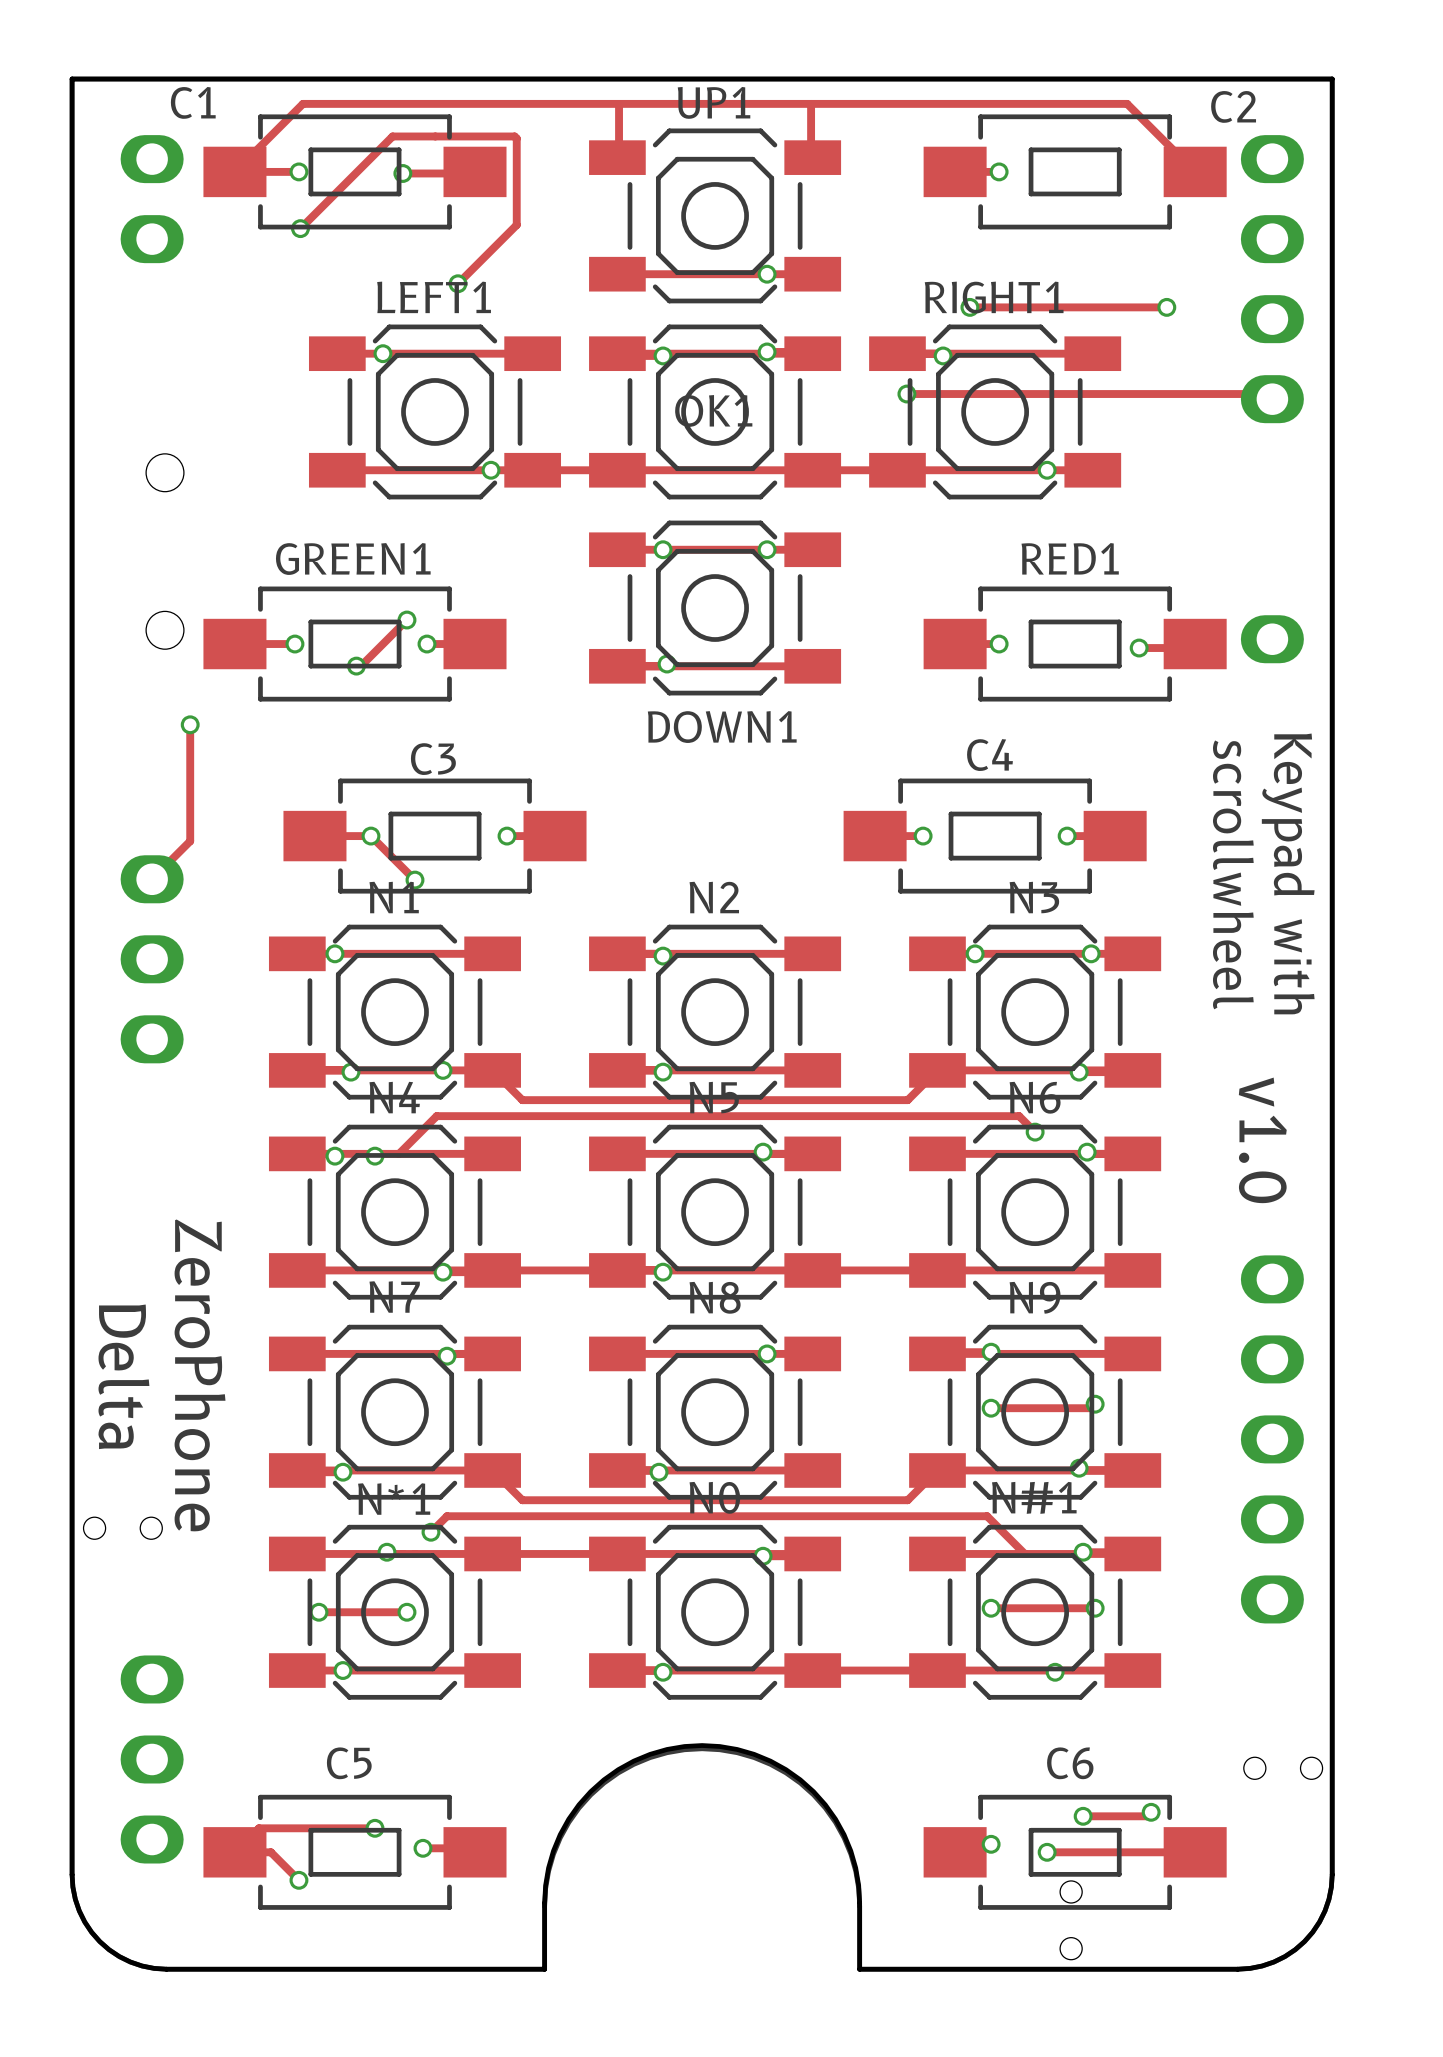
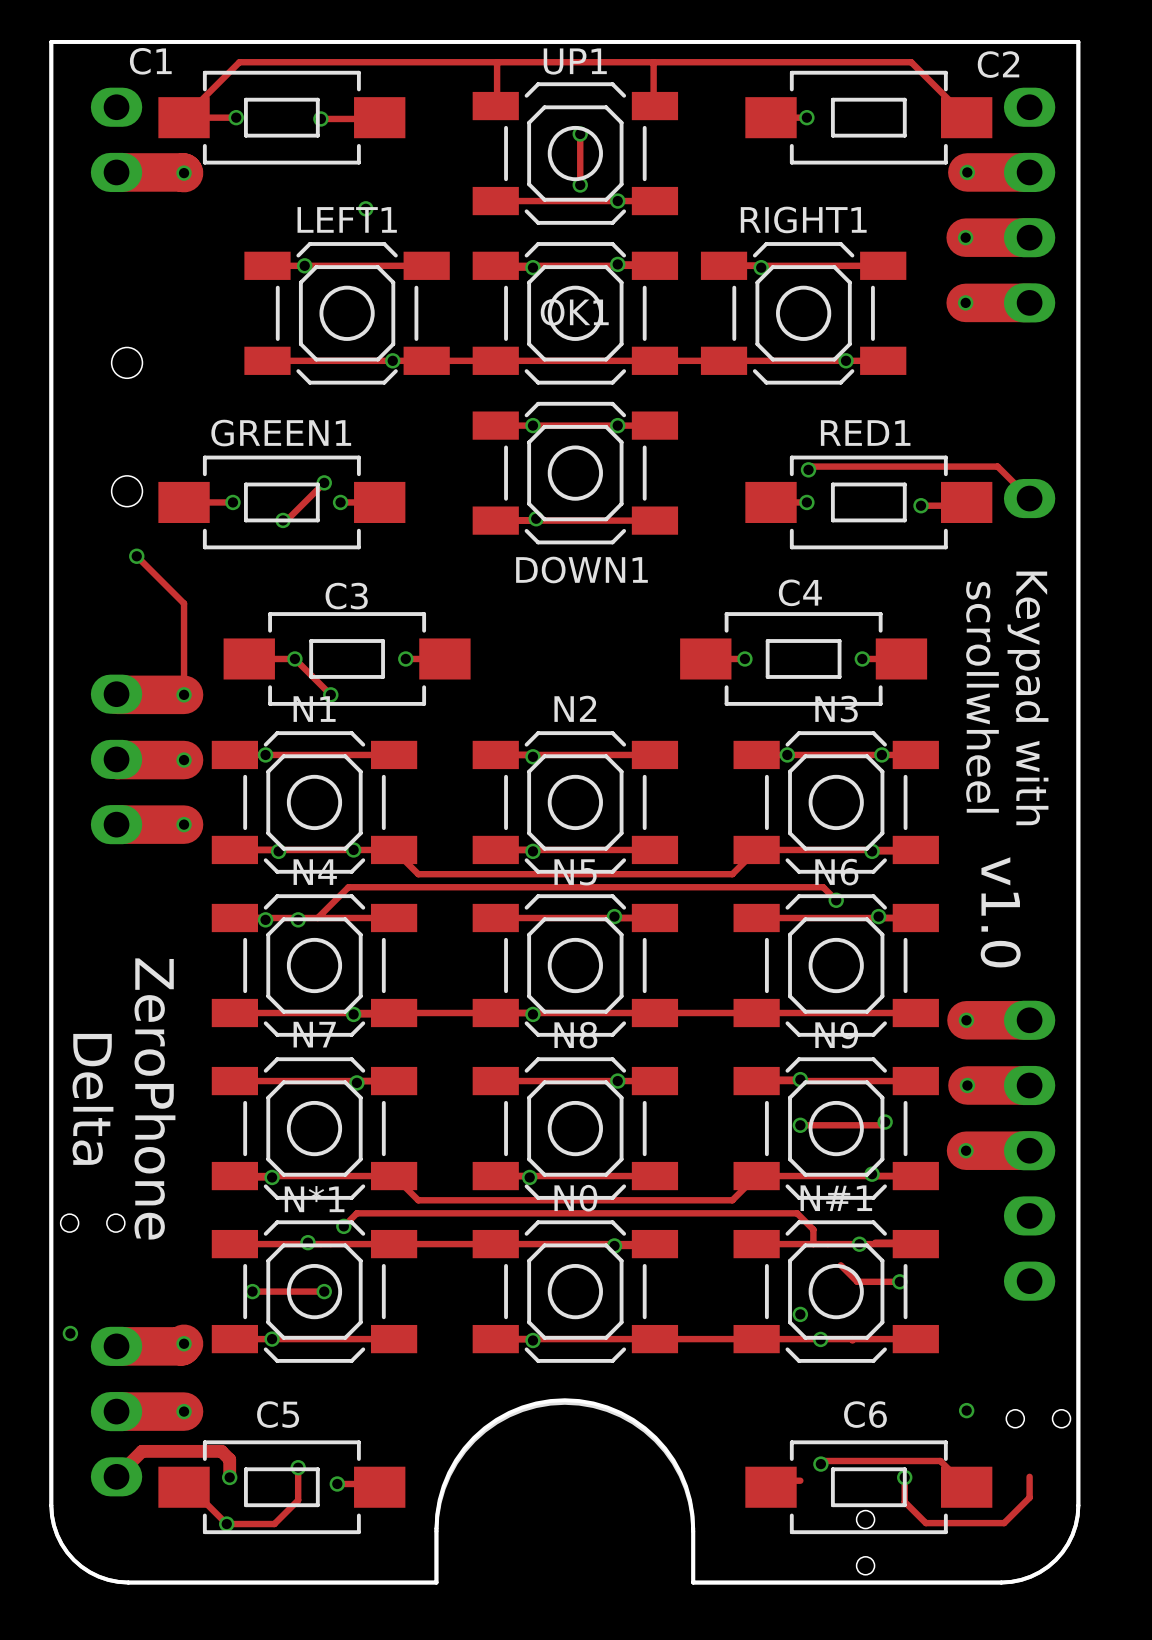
track: none -> (580, 133) (580, 187)
via: none -> (580, 133)
track: (300, 228) (392, 136) (514, 136) (516, 138) (516, 225) (457, 283) -> none
via position: (300, 228) -> (184, 173)
track: none -> (116, 172) (184, 173)
track: none -> (967, 172) (1029, 172)
via: none -> (967, 172)
via: none -> (580, 184)
track: (969, 307) (1166, 307) -> none
via: (969, 307) -> none
via position: (1166, 307) -> (965, 237)
track: none -> (965, 237) (1029, 237)
track: (906, 394) (1267, 394) (1272, 399) -> (965, 302) (1029, 302)
via: (906, 394) -> none
via: none -> (965, 302)
track: none -> (808, 469) (811, 466) (997, 466) (1029, 498)
via: none -> (808, 469)
track: (190, 724) (190, 841) (152, 879) -> (136, 556) (184, 603) (184, 694) (116, 694)
via position: (190, 724) -> (136, 556)
text position: Keypad with (1288, 873) -> Keypad with (1028, 698)
text position: scrollwheel (1233, 874) -> scrollwheel (982, 697)
via: none -> (184, 694)
track: none -> (116, 759) (184, 760)
via: none -> (184, 760)
track: none -> (116, 824) (184, 824)
via: none -> (184, 824)
text position: v1.0 (1262, 1140) -> v1.0 (1000, 912)
track: none -> (966, 1020) (1029, 1020)
via: none -> (966, 1020)
track: none -> (967, 1085) (1029, 1085)
via: none -> (967, 1085)
track: none -> (966, 1150) (1029, 1150)
via: none -> (966, 1150)
track: (1007, 1536) (1024, 1553) -> (813, 1229) (813, 1244)
via position: (1083, 1552) -> (859, 1244)
track: none -> (840, 1265) (857, 1281) (899, 1281)
track: (991, 1608) (1095, 1608) -> none
via position: (991, 1608) -> (800, 1314)
via position: (1095, 1608) -> (899, 1281)
via: none -> (70, 1333)
via: none -> (820, 1339)
via: (1055, 1672) -> none
track: none -> (119, 1343) (116, 1346) (181, 1346) (184, 1343)
via: none -> (184, 1343)
via: none -> (966, 1410)
track: none -> (116, 1411) (184, 1411)
via: none -> (184, 1411)
track: (1151, 1812) (1147, 1816) (1083, 1816) -> none
via: (1151, 1812) -> none
via: (1083, 1816) -> none
via: none -> (820, 1464)
track: (374, 1828) (258, 1828) (234, 1852) -> (298, 1467) (298, 1500) (274, 1524) (226, 1524) (189, 1487)
track: none -> (116, 1476) (141, 1451) (221, 1451) (229, 1459) (229, 1477)
track: none -> (1029, 1476) (1029, 1497) (1004, 1523) (925, 1523) (904, 1501) (904, 1477)
via: none -> (229, 1477)
via: none -> (904, 1477)
via: (991, 1844) -> none
track: (242, 1852) (270, 1852) (298, 1880) -> none
track: (1047, 1852) (1195, 1852) -> (820, 1464) (823, 1460) (940, 1460) (966, 1487)
via: (1047, 1852) -> none
via position: (298, 1880) -> (226, 1524)

